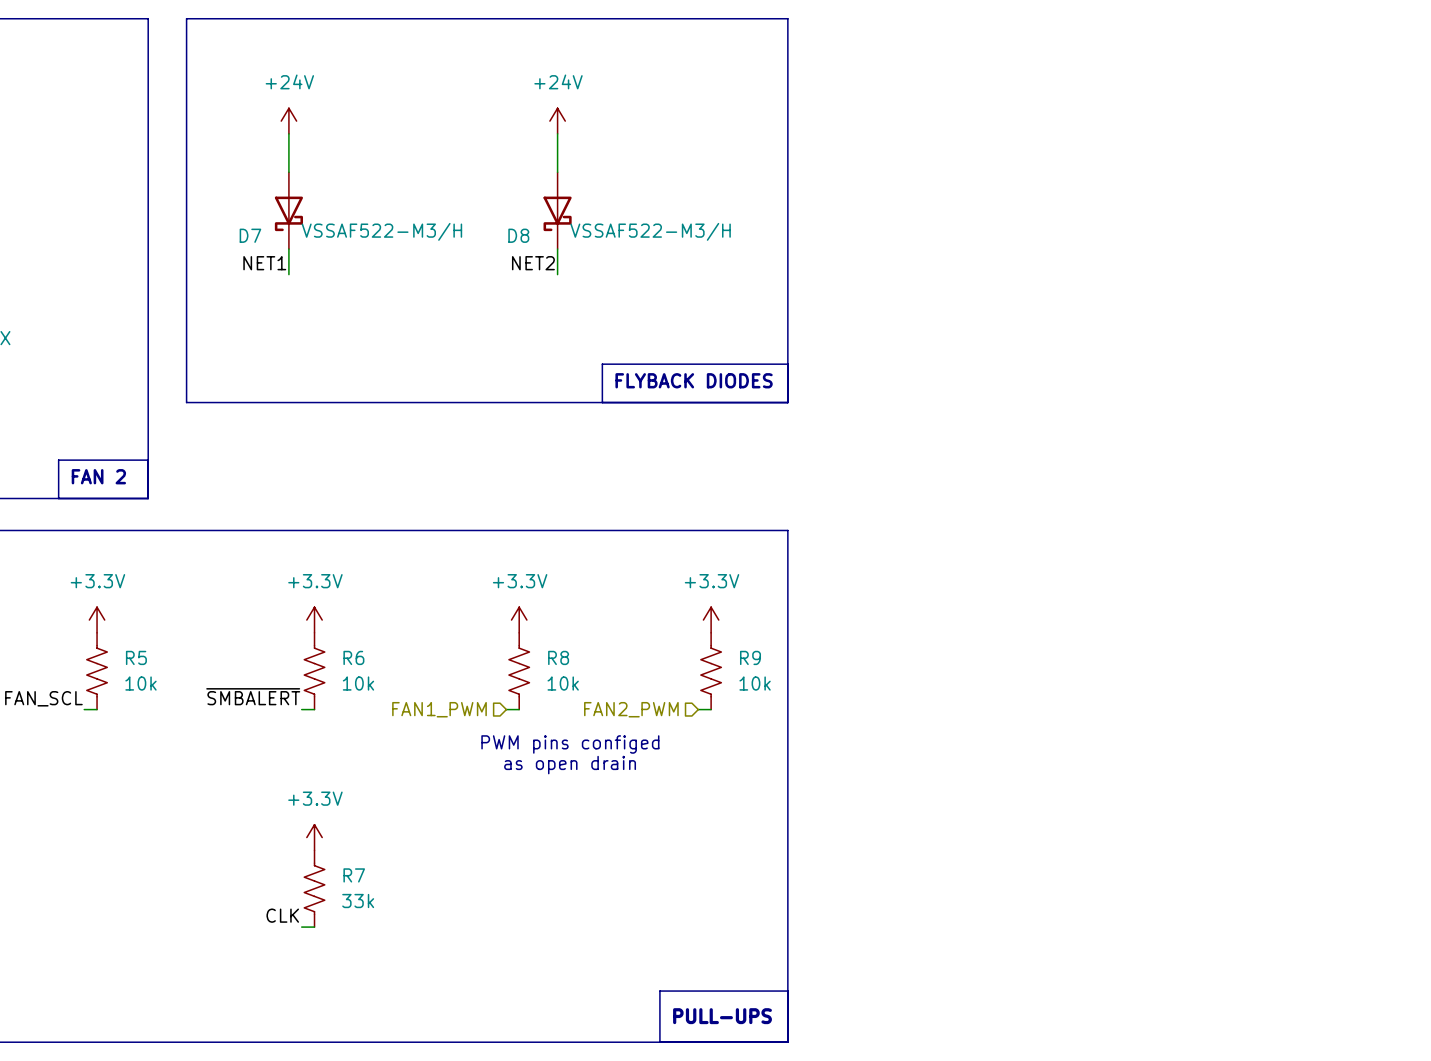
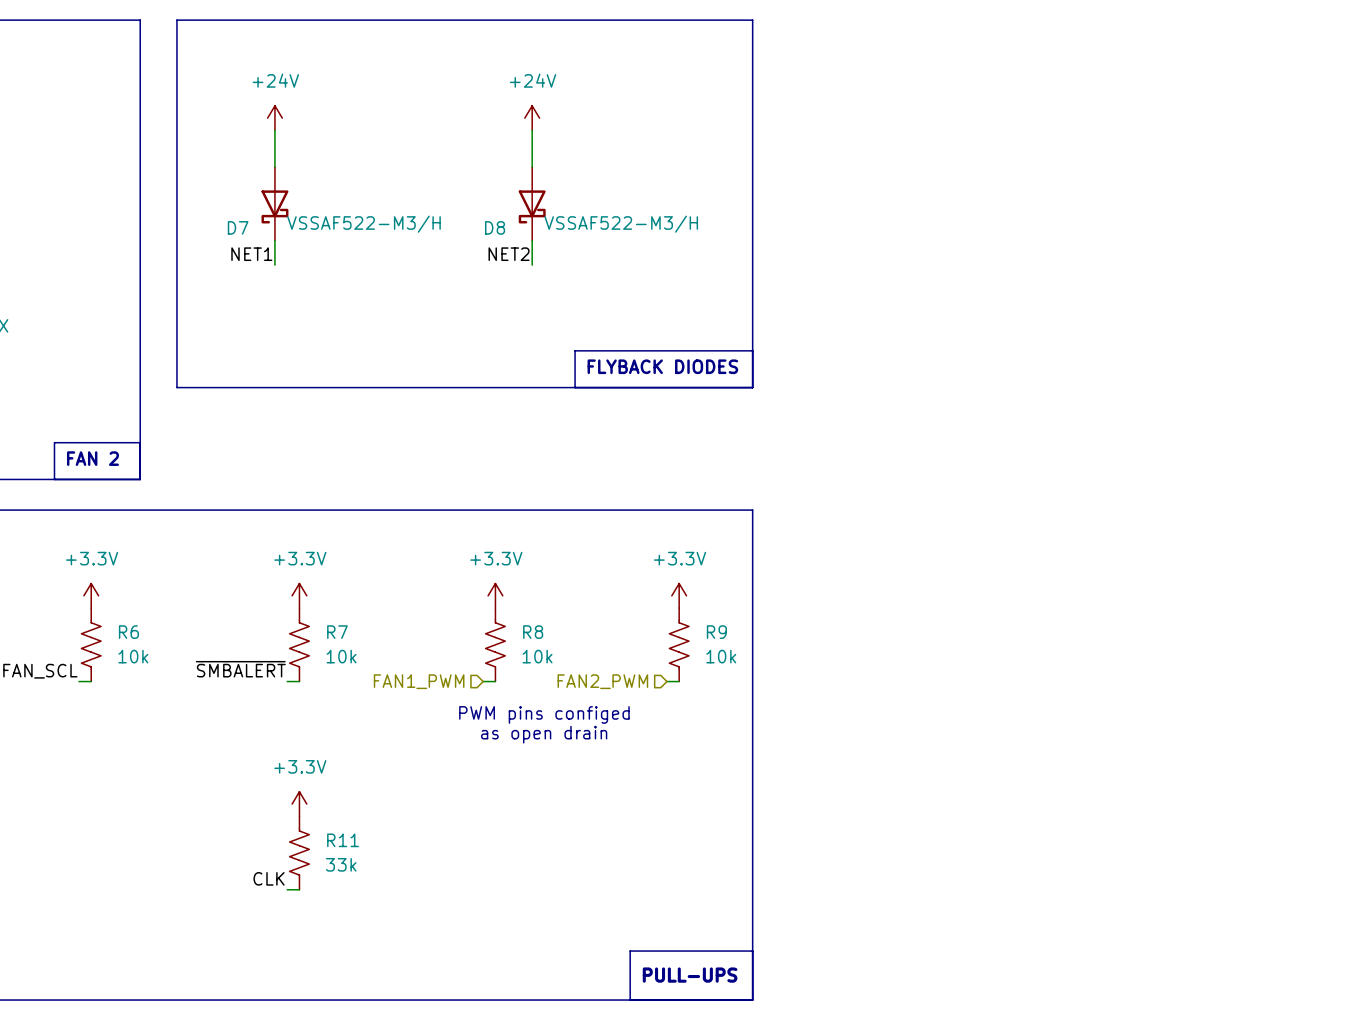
R5 name: R5 (136, 657) -> R6 (128, 632)
R6 name: R6 (353, 657) -> R7 (337, 632)
R7 name: R7 (354, 875) -> R11 (343, 840)

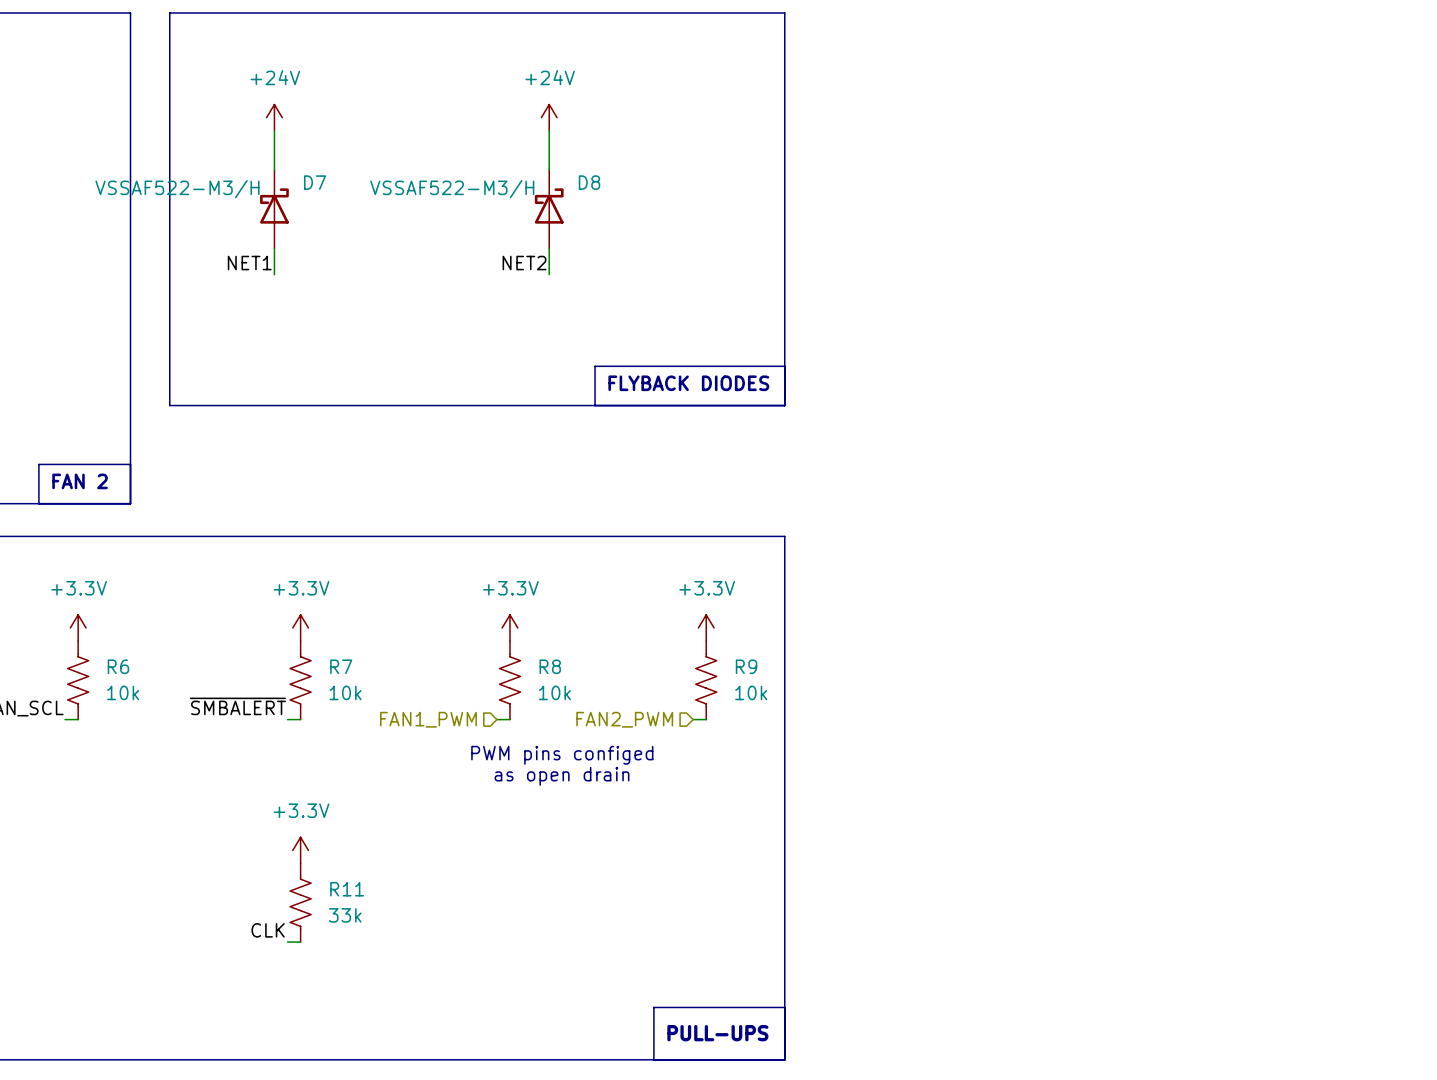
D7 rotation: 0° (274, 206) -> 180° (274, 206)
D8 rotation: 0° (532, 206) -> 180° (549, 206)

